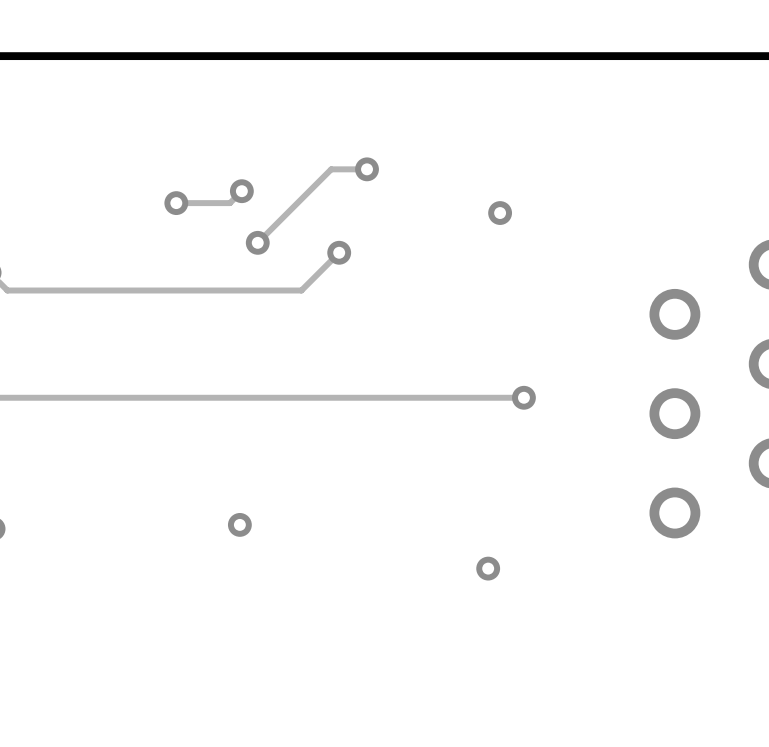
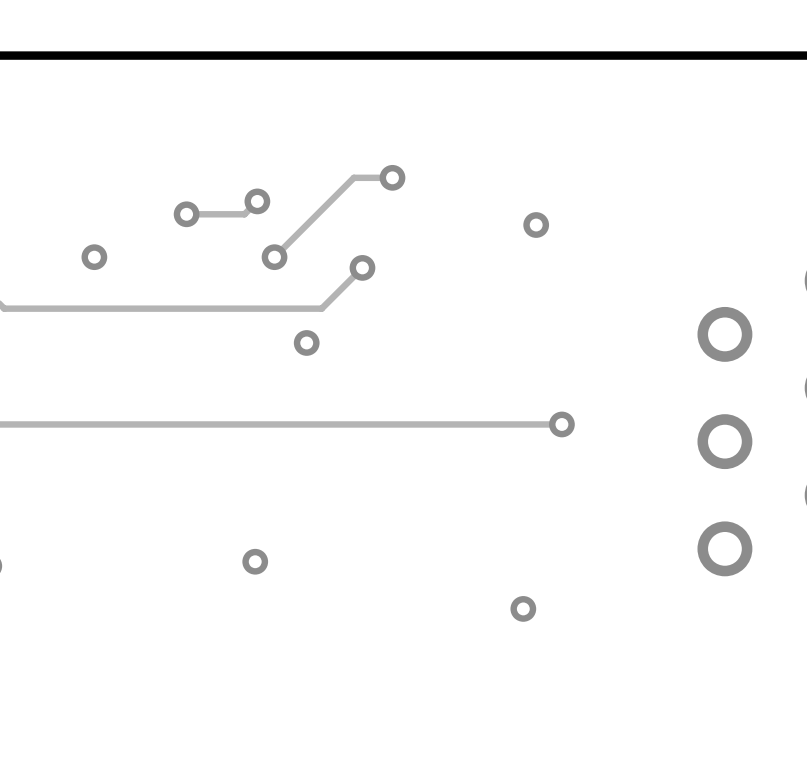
via: none -> (94, 257)
via: none -> (306, 342)

